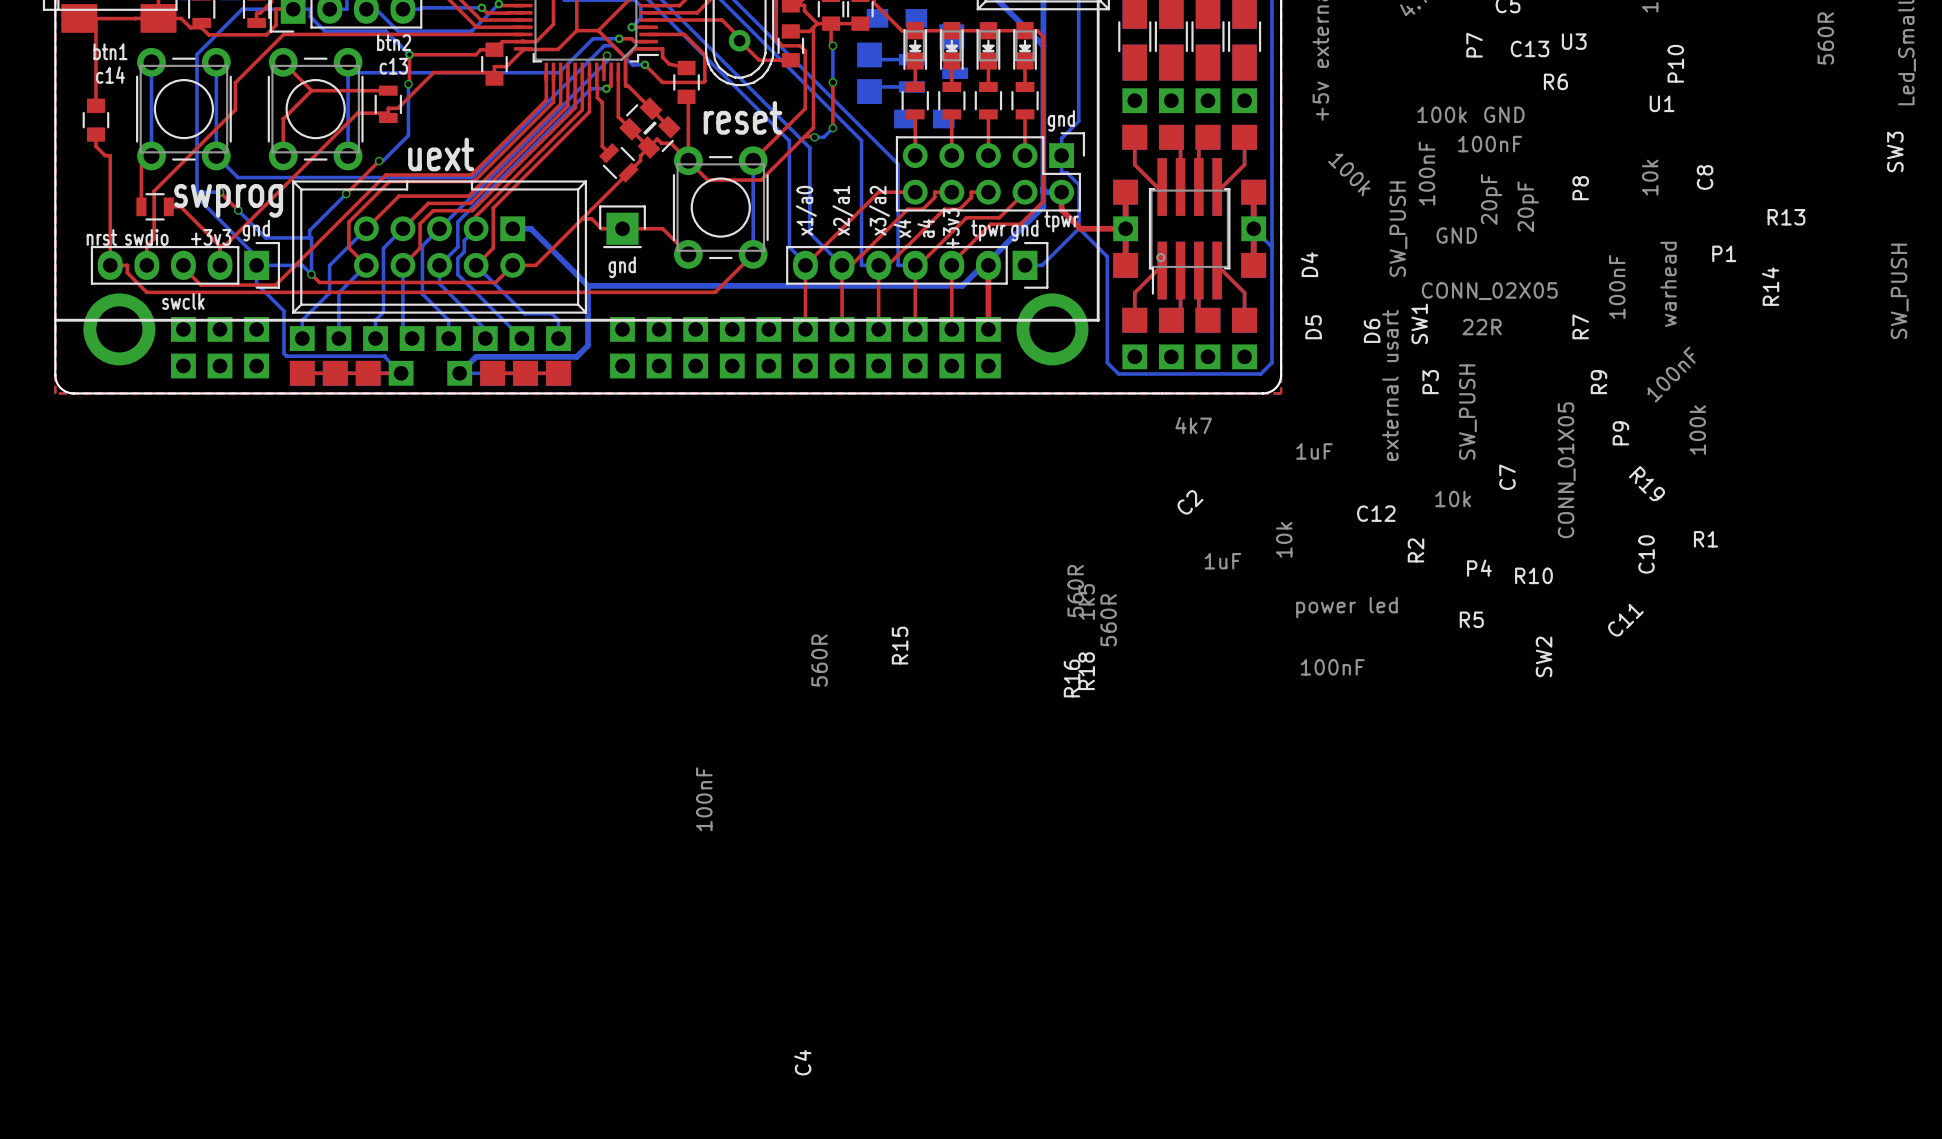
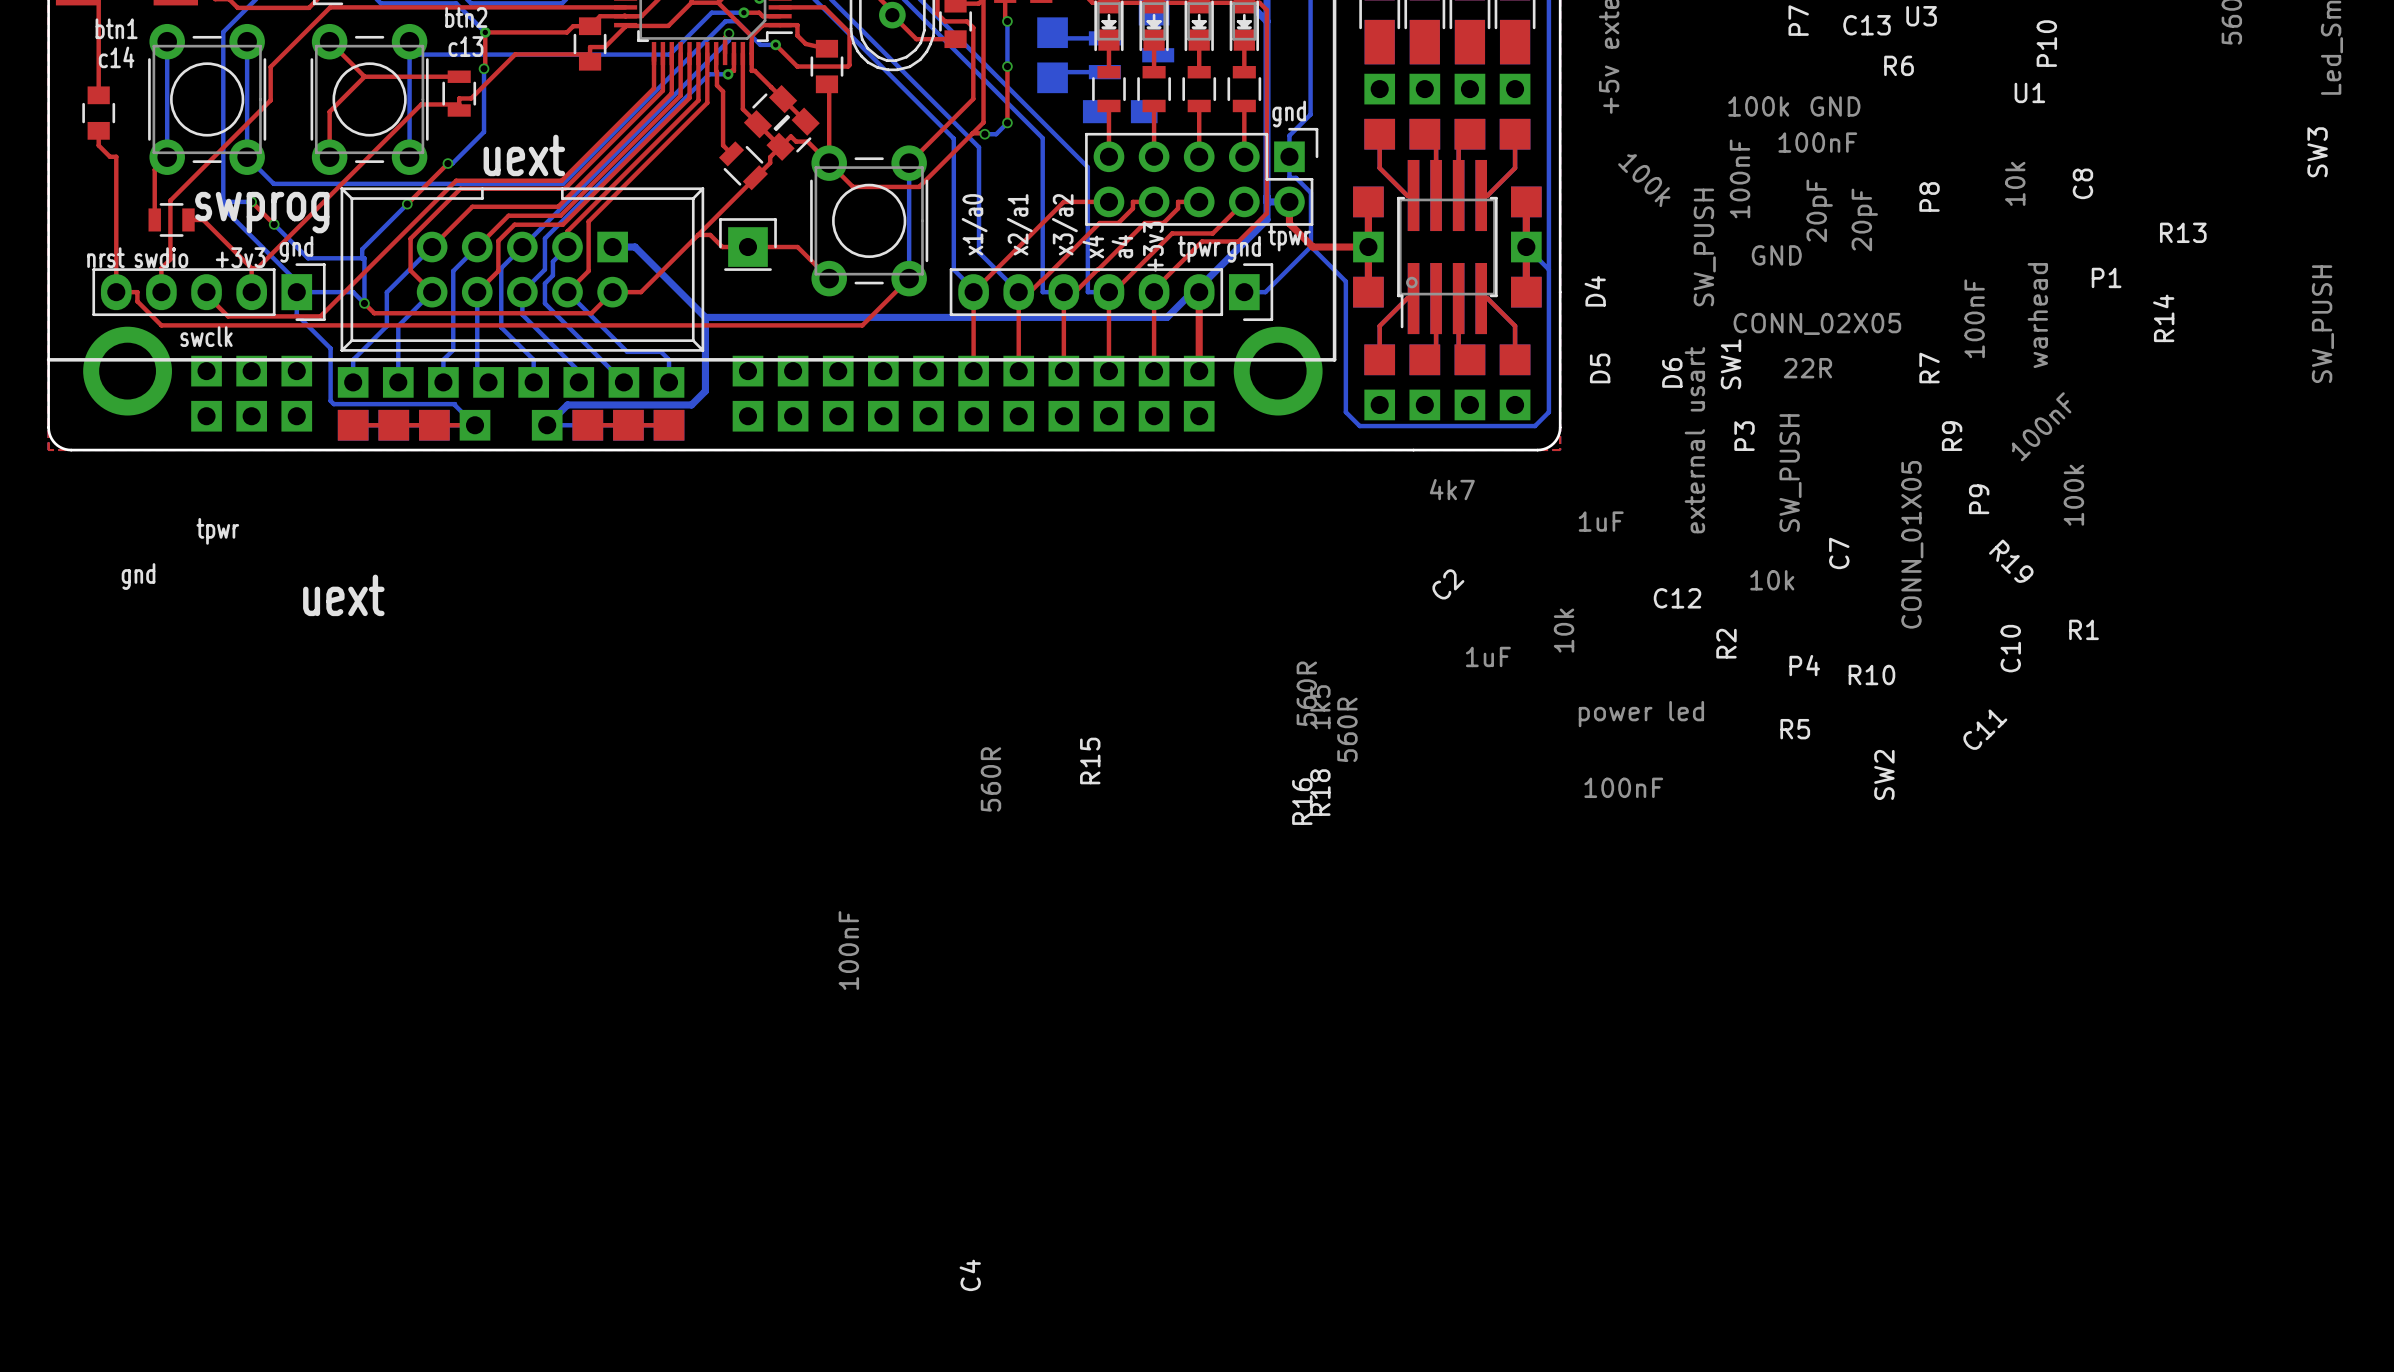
text: reset (743, 117) -> none
text: gnd (622, 267) -> none
text: none -> tpwr (217, 531)
text: none -> gnd (138, 576)
text: none -> uext (343, 595)

